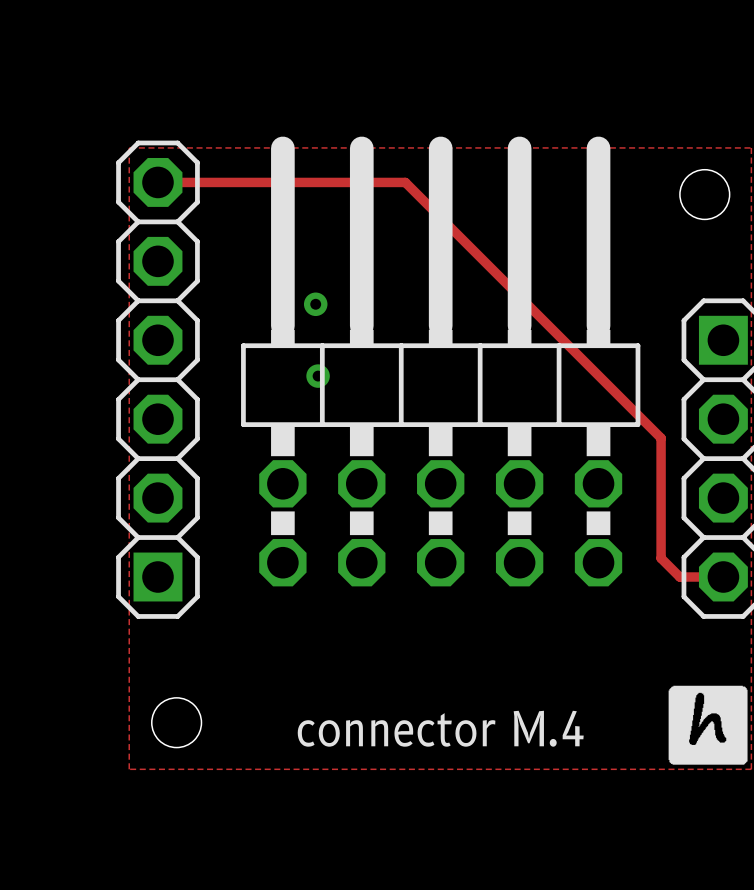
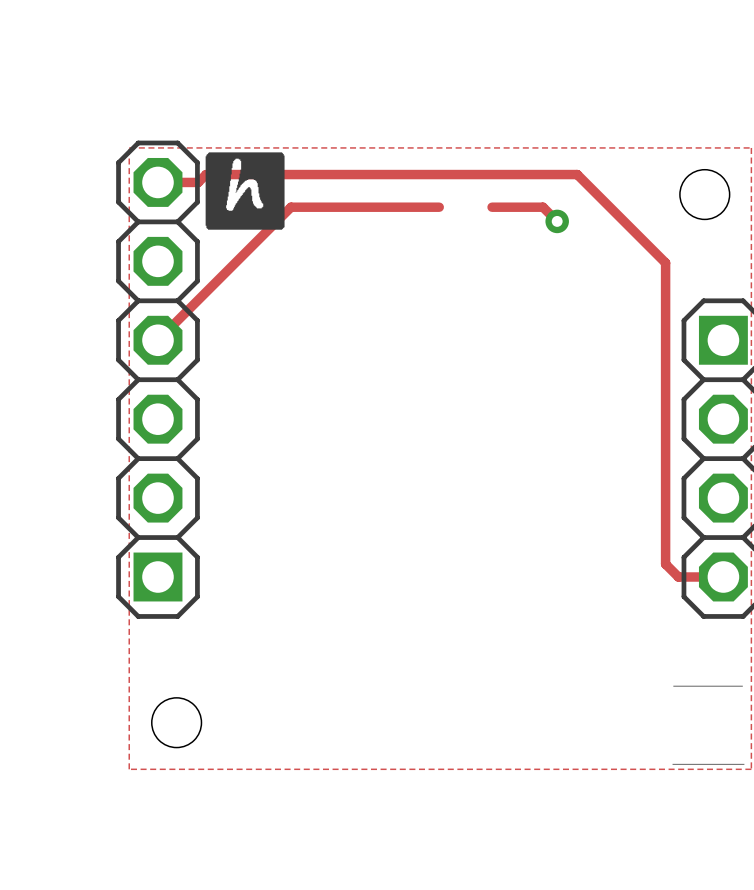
drawing: none -> [205, 152, 285, 230]
track: (198, 182) (405, 182) (661, 438) (661, 558) (679, 577) -> (198, 182) (206, 174) (577, 174) (665, 262) (665, 564) (679, 577)
track: none -> (439, 207) (291, 207) (157, 340)
track: none -> (492, 207) (542, 207) (557, 221)
via: none -> (557, 221)
via: (315, 304) -> none
part: (440, 361) -> none
via: (318, 376) -> none
drawing: [668, 686, 748, 764] -> none
text: connector M.4 (440, 728) -> none

